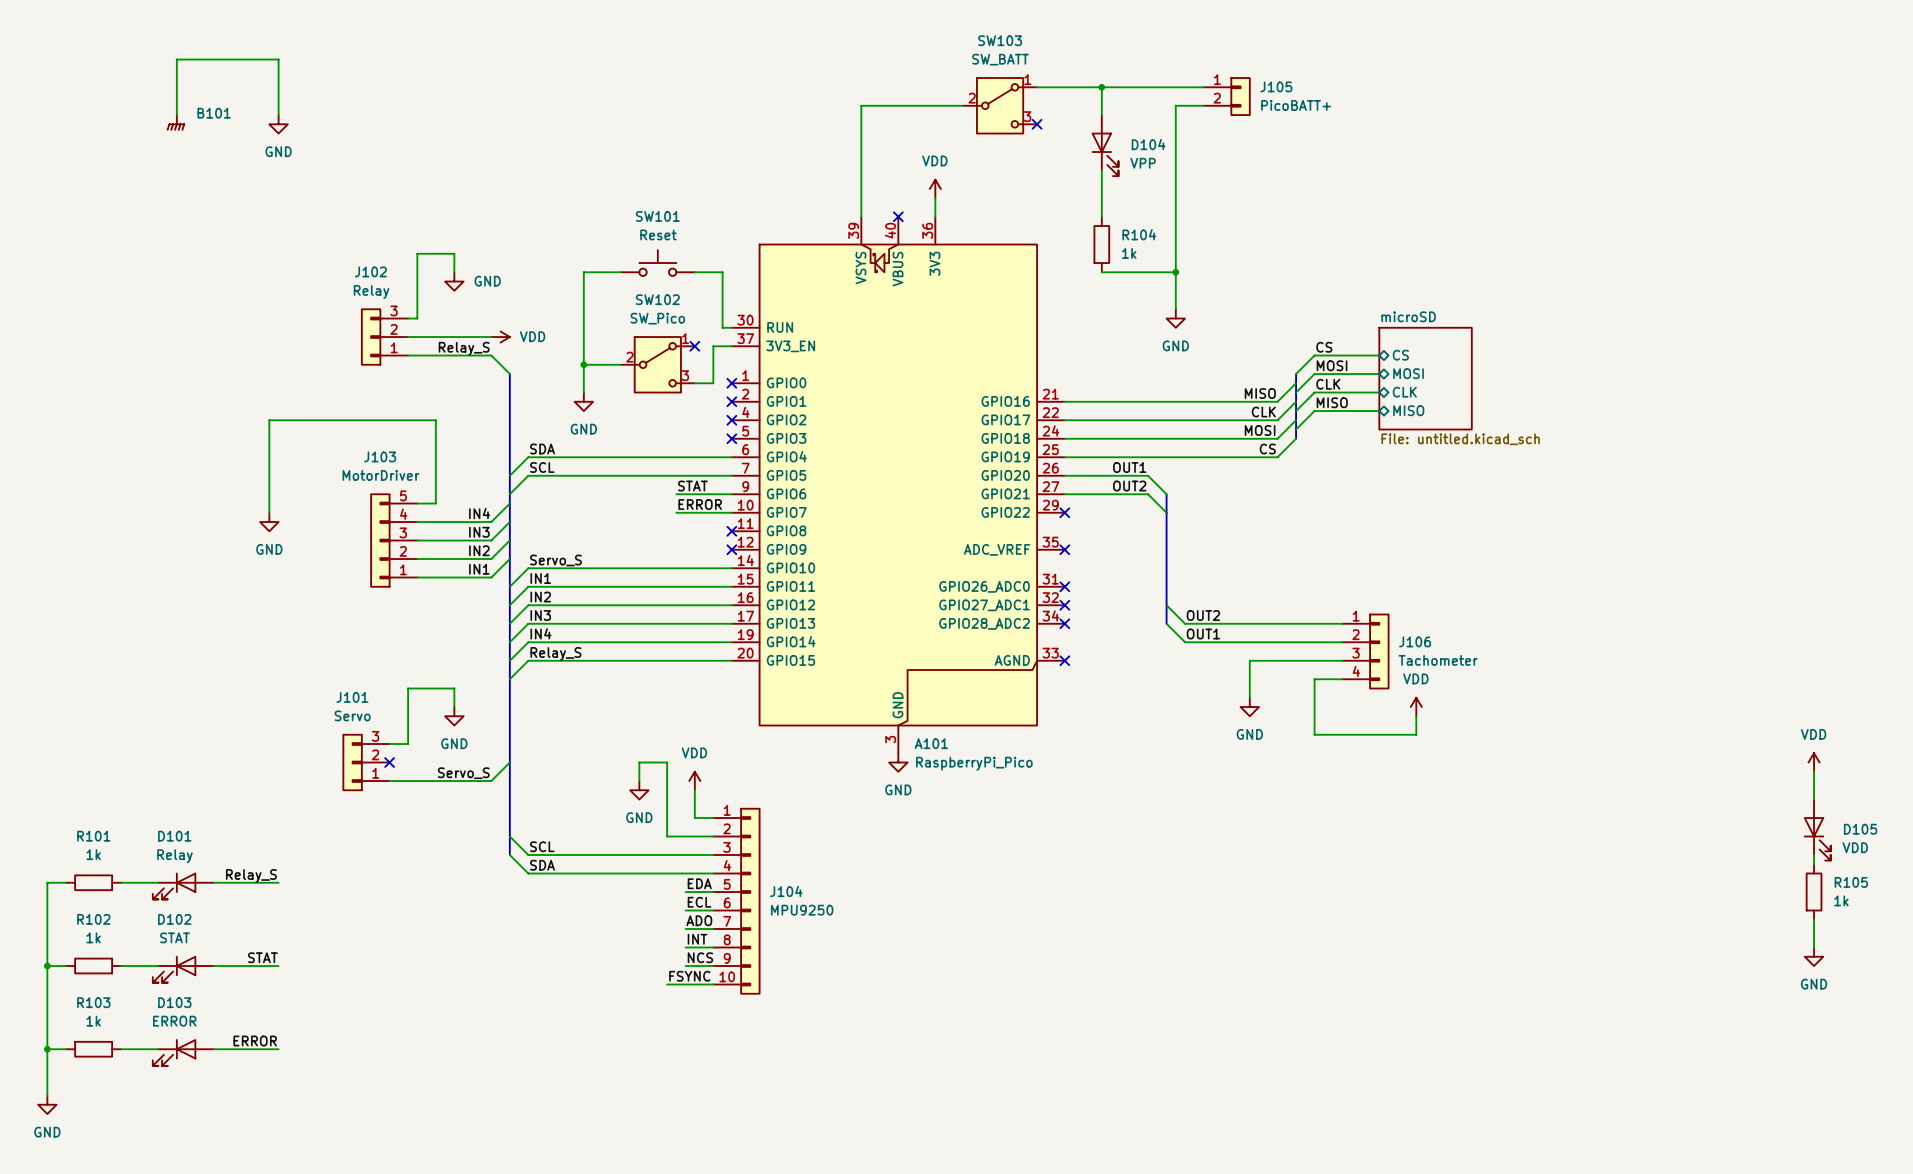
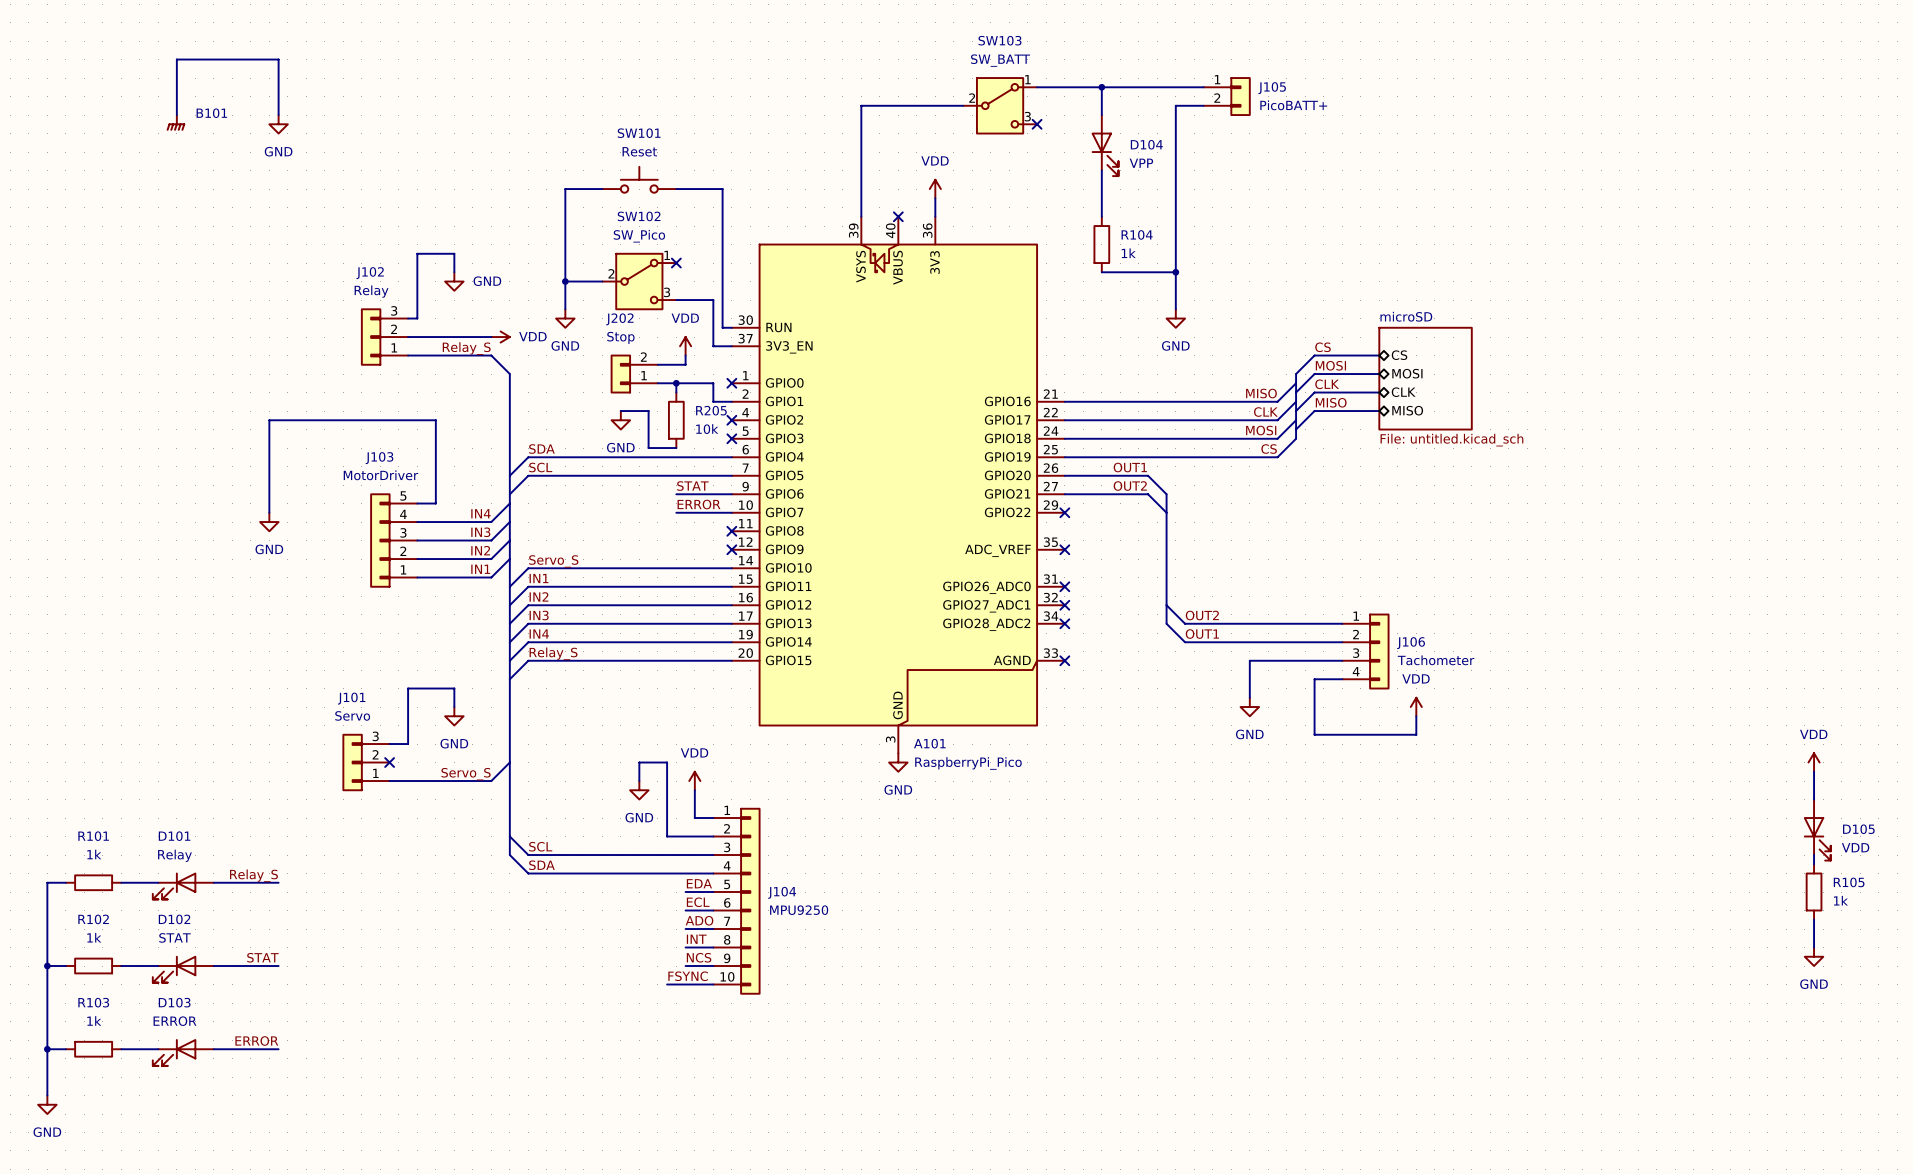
SW101 position: (657, 263) -> (639, 179)
no-connect mark: none -> (676, 263)
wire: (620, 272) (583, 272) (583, 392) -> (602, 189) (565, 189) (565, 309)
wire: (694, 272) (722, 272) -> (676, 189) (722, 189) (722, 272)
junction: none -> (565, 281)
wire: none -> (676, 300) (713, 300) (713, 346)
power symbol: none -> GND (565, 318)
power symbol: none -> VDD (685, 346)
no-connect mark: (694, 346) -> none
wire: (713, 346) (713, 383) -> (731, 401) (713, 401) (713, 383)
wire: none -> (685, 355) (685, 364) (657, 364)
wire: (583, 364) (620, 364) -> (565, 281) (602, 281)
junction: (583, 364) -> none
SW102 position: (657, 364) -> (639, 281)
J202: none -> Stop (634, 374)
junction: none -> (676, 383)
power symbol position: GND (583, 401) -> GND (620, 420)
no-connect mark: (731, 401) -> none
wire: none -> (620, 411) (648, 411) (648, 448) (676, 448)
R205: none -> 10k (676, 420)

